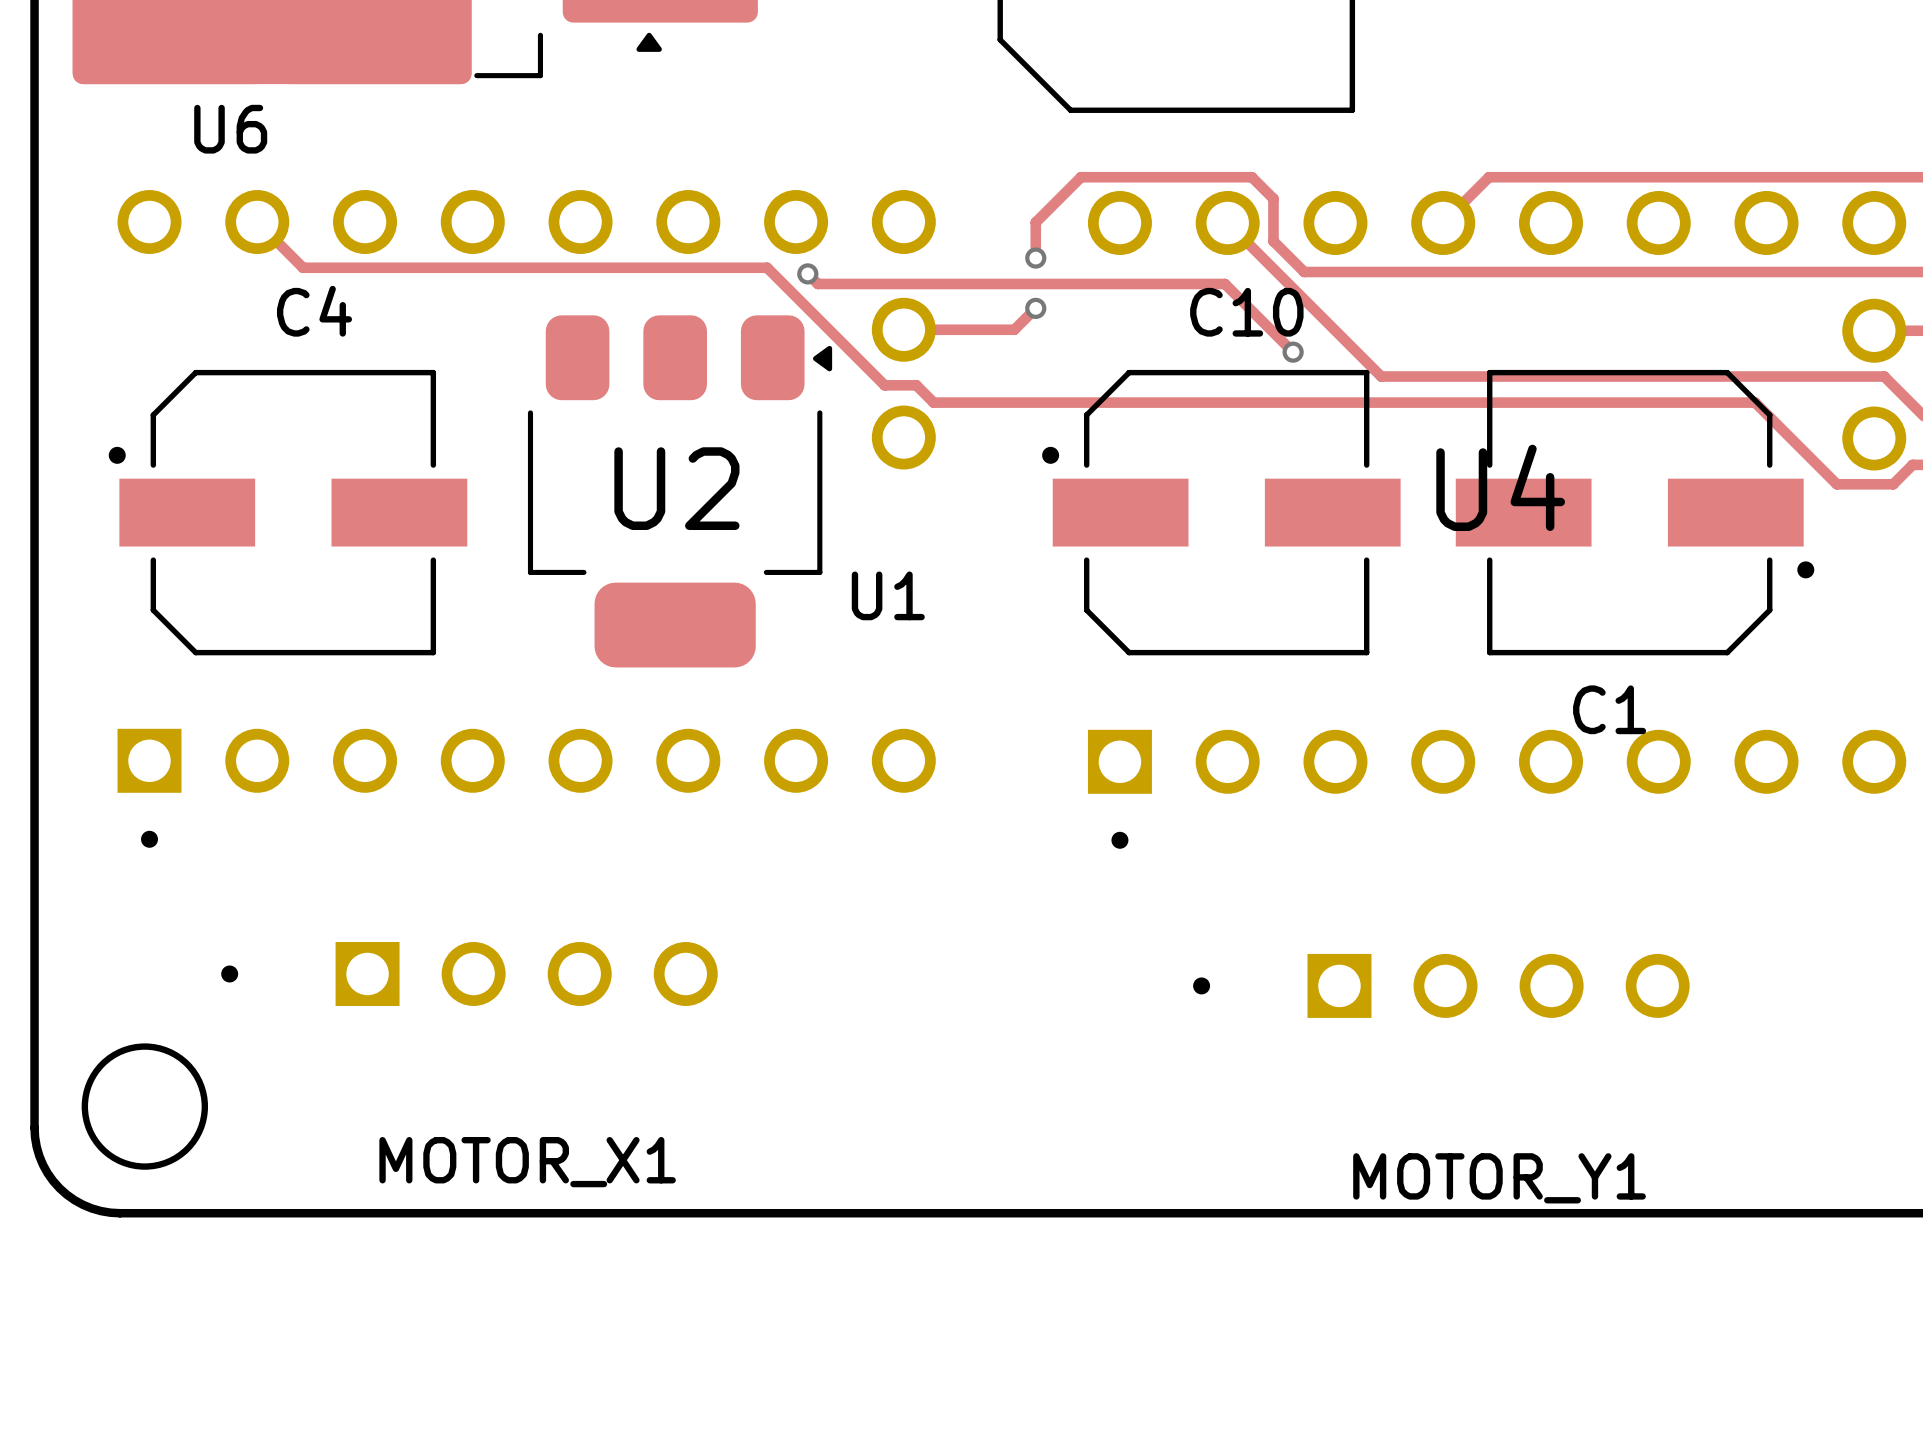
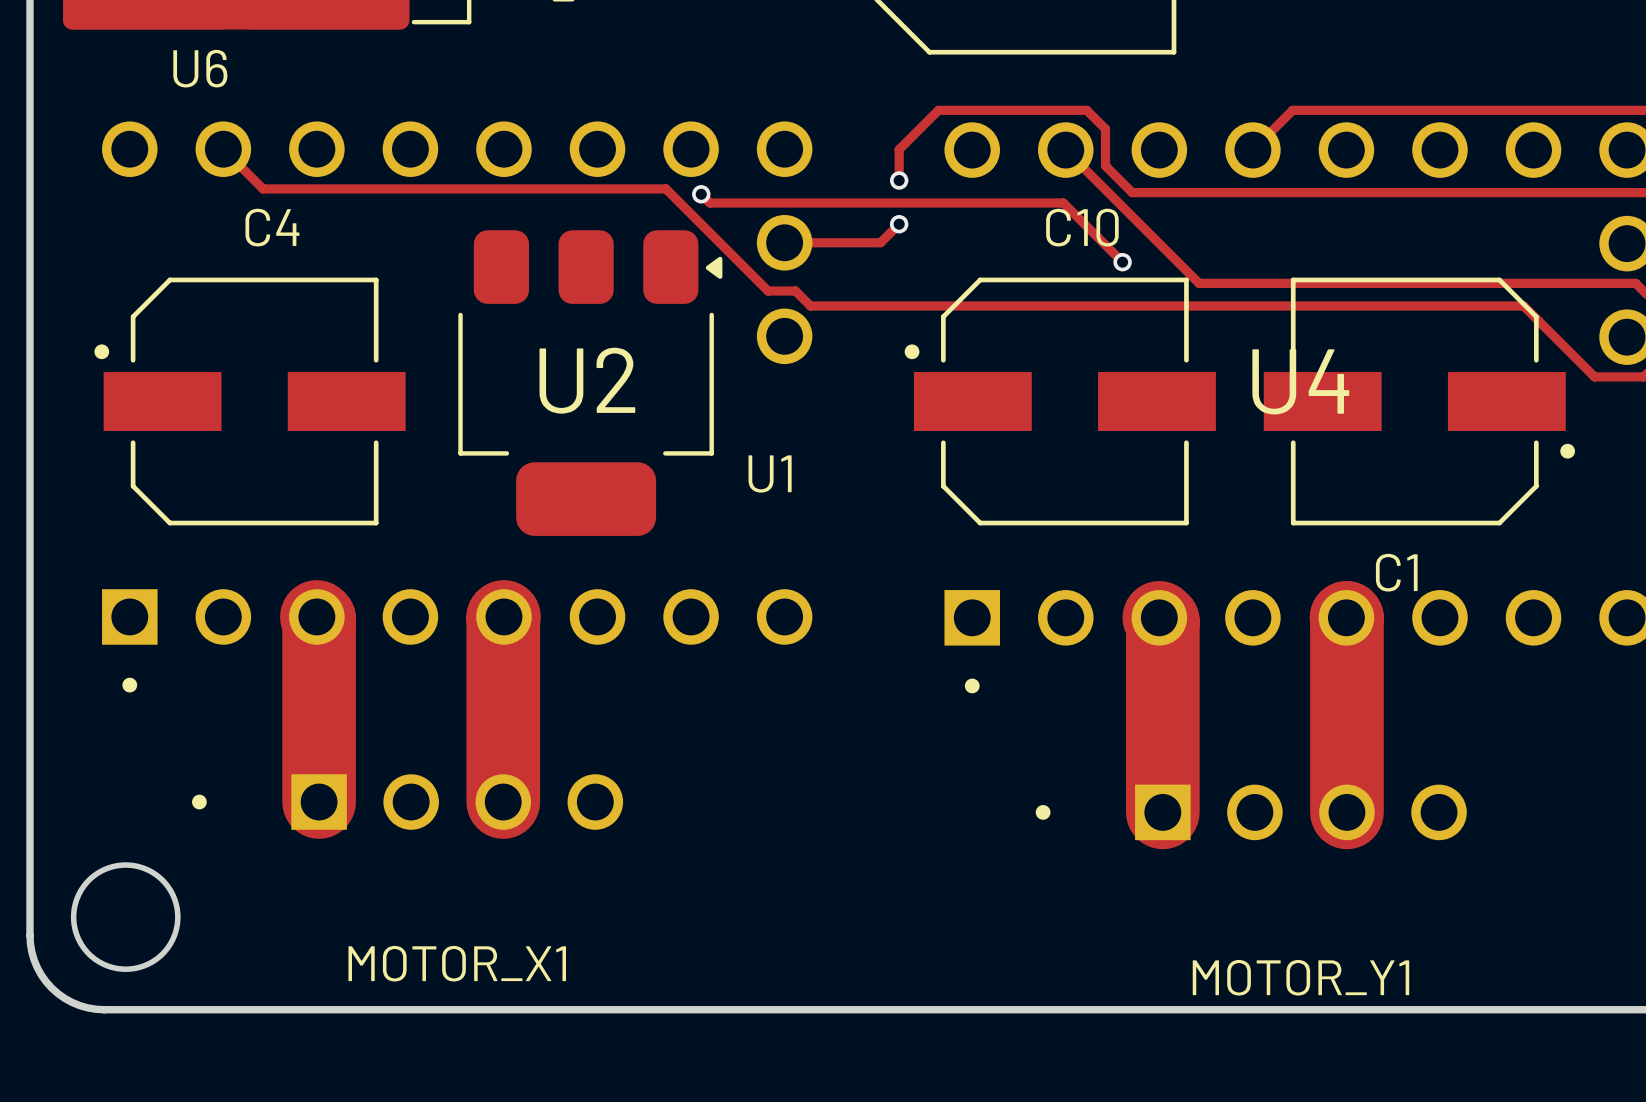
track: none -> (316, 616) (319, 619) (319, 802)
track: none -> (503, 616) (503, 802)
track: none -> (1159, 617) (1162, 621) (1162, 812)
track: none -> (1346, 617) (1346, 812)

